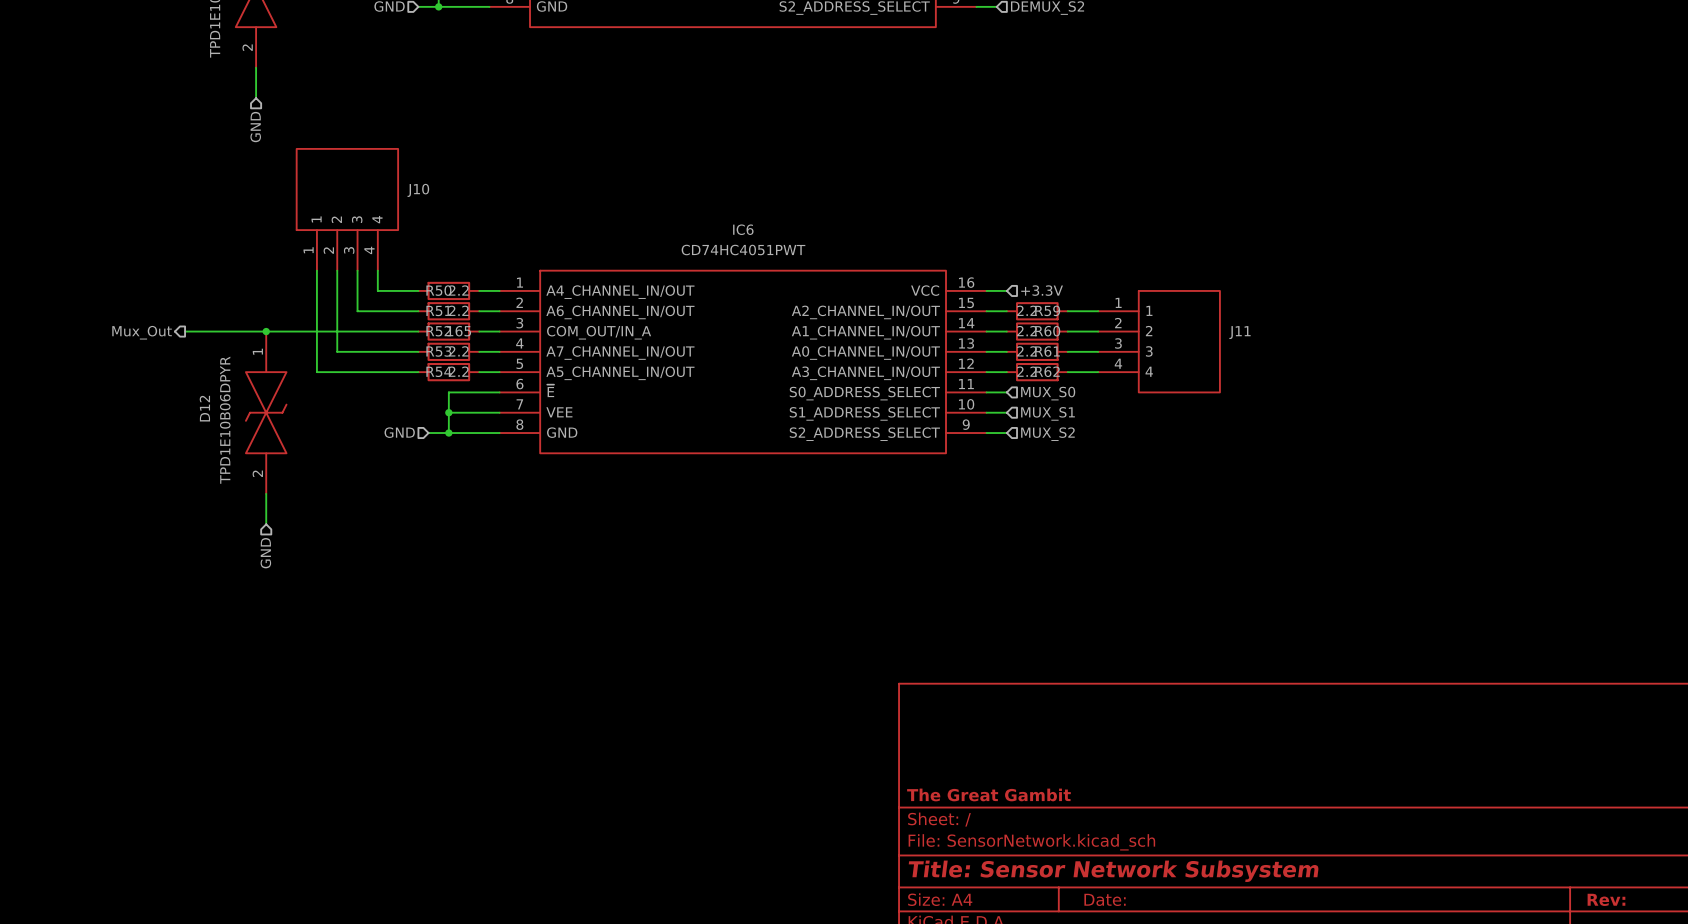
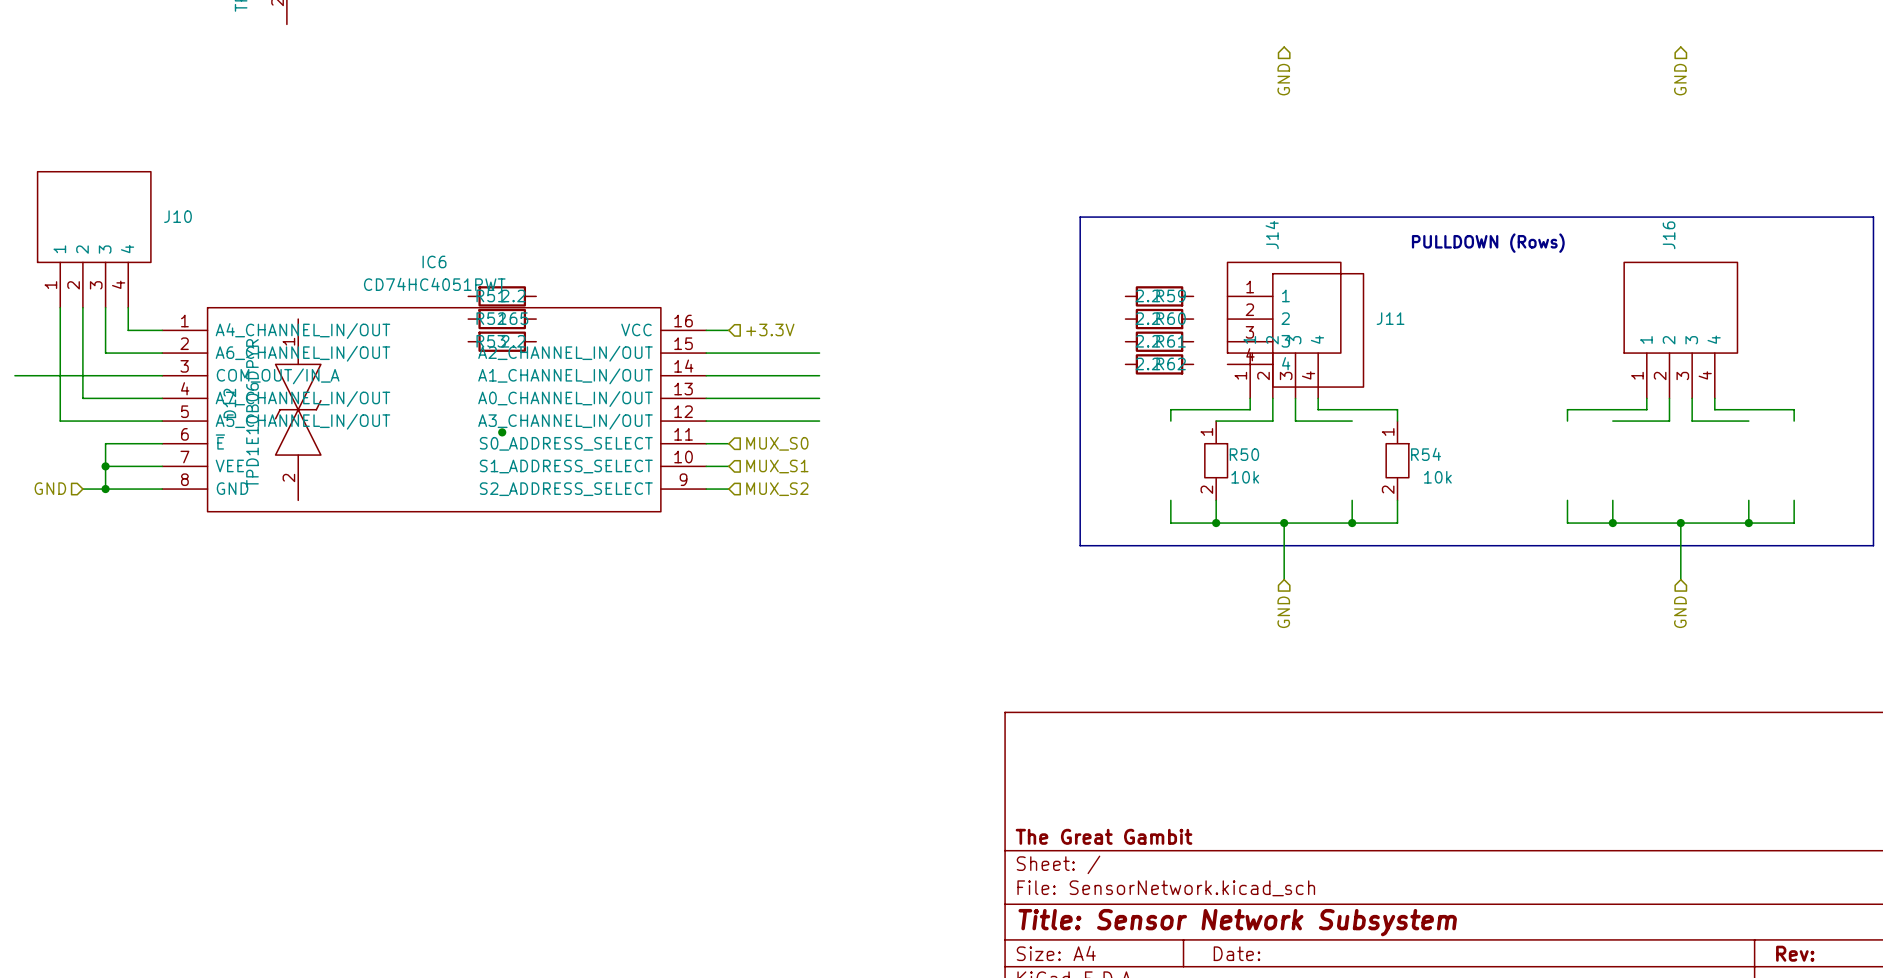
wire: (256, 67) (256, 98) -> none
hierarchical label: none -> GND (1283, 79)
hierarchical label: none -> GND (1680, 79)
hierarchical label: GND (255, 127) -> none
J10 position: (347, 209) -> (94, 239)
line: none -> (1080, 217) (1873, 217) (1873, 545) (1080, 545) (1080, 217)
text: none -> PULLDOWN (Rows) (1488, 243)
wire: (316, 270) (316, 372) (418, 372) -> none
wire: (337, 270) (337, 351) (418, 351) -> none
wire: (357, 270) (357, 311) (418, 311) -> none
wire: (377, 270) (377, 290) (418, 290) -> none
R50 symbol: [418, 281, 480, 301] -> [1204, 421, 1229, 501]
R50 name position: R50 (438, 290) -> R50 (1244, 454)
R50 value: 2.2 (458, 290) -> 10k (1245, 477)
wire: (479, 290) (499, 290) -> none
wire: (986, 290) (1006, 290) -> none
hierarchical label: +3.3V (1042, 290) -> none
wire: (479, 311) (499, 311) -> (706, 330) (728, 330)
wire: (986, 311) (1006, 311) -> none
wire: (1067, 311) (1098, 311) -> none
wire: none -> (60, 307) (60, 421) (162, 421)
wire: none -> (82, 307) (82, 398) (162, 398)
wire: none -> (105, 307) (105, 353) (162, 353)
wire: none -> (128, 307) (128, 330) (162, 330)
wire: (185, 331) (418, 331) -> none
junction: (266, 331) -> none
wire: (479, 331) (499, 331) -> (706, 443) (728, 443)
wire: (986, 331) (1006, 331) -> none
wire: (1067, 331) (1098, 331) -> none
hierarchical label: Mux_Out (142, 332) -> none
hierarchical label: none -> +3.3V (770, 329)
J14: none -> (1284, 330)
J16: none -> (1680, 330)
wire: (479, 351) (499, 351) -> (706, 466) (728, 466)
wire: (986, 351) (1006, 351) -> none
wire: (1067, 351) (1098, 351) -> none
wire: none -> (706, 353) (819, 353)
IC6 position: (743, 361) -> (434, 409)
R54 symbol: [418, 363, 480, 382] -> [1385, 421, 1410, 501]
R54 name position: R54 (439, 371) -> R54 (1426, 454)
R54 value: 2.2 (458, 371) -> 10k (1437, 477)
wire: (479, 372) (499, 372) -> (706, 489) (728, 489)
wire: (986, 372) (1006, 372) -> none
wire: (1067, 372) (1098, 372) -> none
wire: none -> (14, 375) (162, 375)
wire: none -> (706, 375) (819, 375)
wire: (499, 392) (448, 392) (448, 433) -> none
wire: (986, 392) (1006, 392) -> none
hierarchical label: MUX_S0 (1048, 393) -> none
wire: none -> (706, 398) (819, 398)
wire: none -> (1250, 398) (1250, 409) (1170, 409) (1170, 421)
wire: none -> (1272, 398) (1272, 421) (1216, 421)
wire: none -> (1295, 398) (1295, 421) (1352, 421)
wire: none -> (1318, 398) (1318, 409) (1397, 409) (1397, 421)
wire: none -> (1646, 398) (1646, 409) (1567, 409) (1567, 421)
wire: none -> (1669, 398) (1669, 421) (1612, 421)
wire: none -> (1692, 398) (1692, 421) (1748, 421)
wire: none -> (1714, 398) (1714, 409) (1794, 409) (1794, 421)
wire: (448, 412) (499, 412) -> none
junction: (448, 412) -> none
wire: (986, 412) (1006, 412) -> none
hierarchical label: MUX_S1 (1047, 413) -> none
wire: none -> (706, 421) (819, 421)
hierarchical label: GND (399, 432) -> none
wire: (428, 433) (499, 433) -> none
wire: (986, 433) (1006, 433) -> none
hierarchical label: MUX_S2 (1047, 434) -> none
wire: none -> (162, 443) (105, 443) (105, 489)
hierarchical label: none -> MUX_S0 (777, 443)
wire: none -> (105, 466) (162, 466)
junction: none -> (105, 466)
hierarchical label: none -> MUX_S1 (777, 466)
hierarchical label: none -> GND (50, 488)
wire: none -> (82, 489) (162, 489)
junction: none -> (105, 489)
hierarchical label: none -> MUX_S2 (777, 489)
wire: (266, 493) (266, 524) -> none
wire: none -> (1170, 500) (1170, 523) (1397, 523) (1397, 500)
wire: none -> (1216, 500) (1216, 523)
wire: none -> (1352, 500) (1352, 523)
wire: none -> (1567, 500) (1567, 523) (1794, 523) (1794, 500)
wire: none -> (1612, 500) (1612, 523)
wire: none -> (1748, 500) (1748, 523)
junction: none -> (1216, 523)
wire: none -> (1284, 523) (1284, 579)
junction: none -> (1284, 523)
junction: none -> (1352, 523)
junction: none -> (1612, 523)
wire: none -> (1680, 523) (1680, 579)
junction: none -> (1680, 523)
junction: none -> (1748, 523)
hierarchical label: GND (265, 553) -> none
hierarchical label: none -> GND (1283, 612)
hierarchical label: none -> GND (1680, 612)

